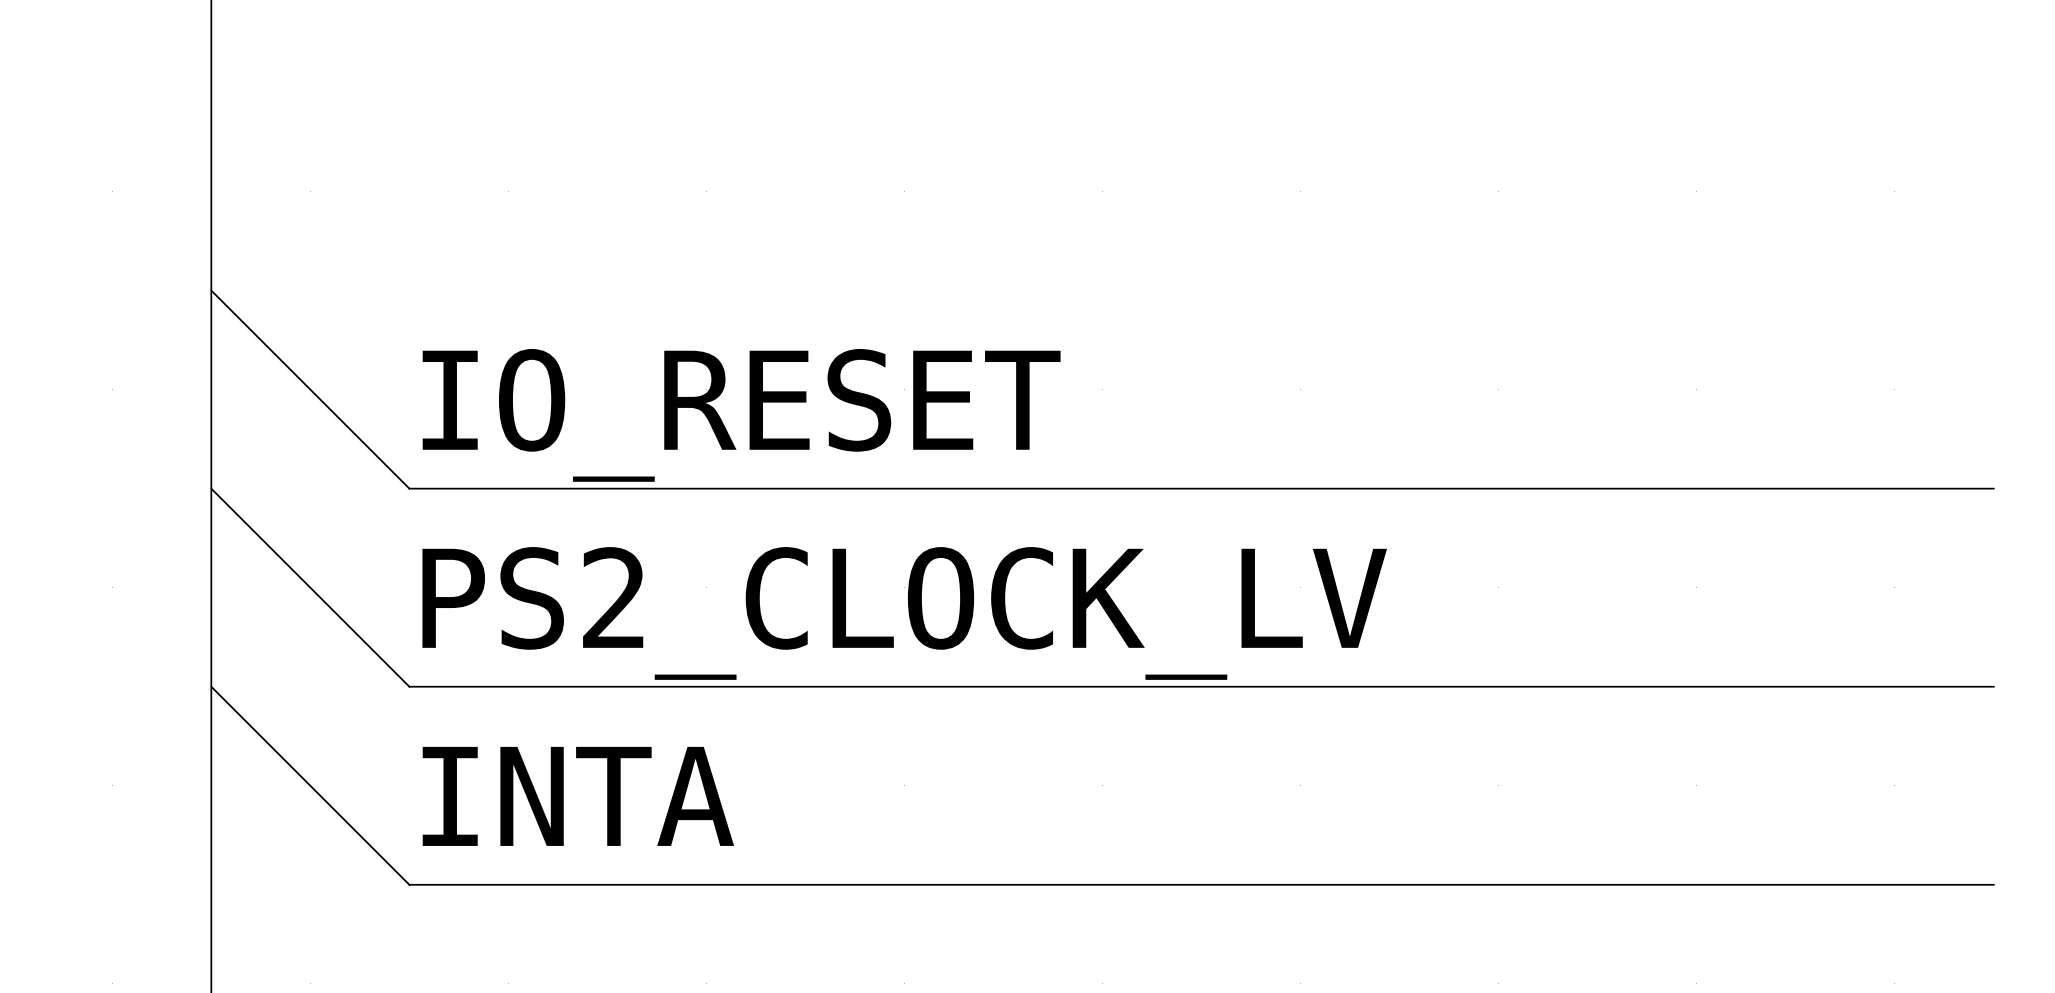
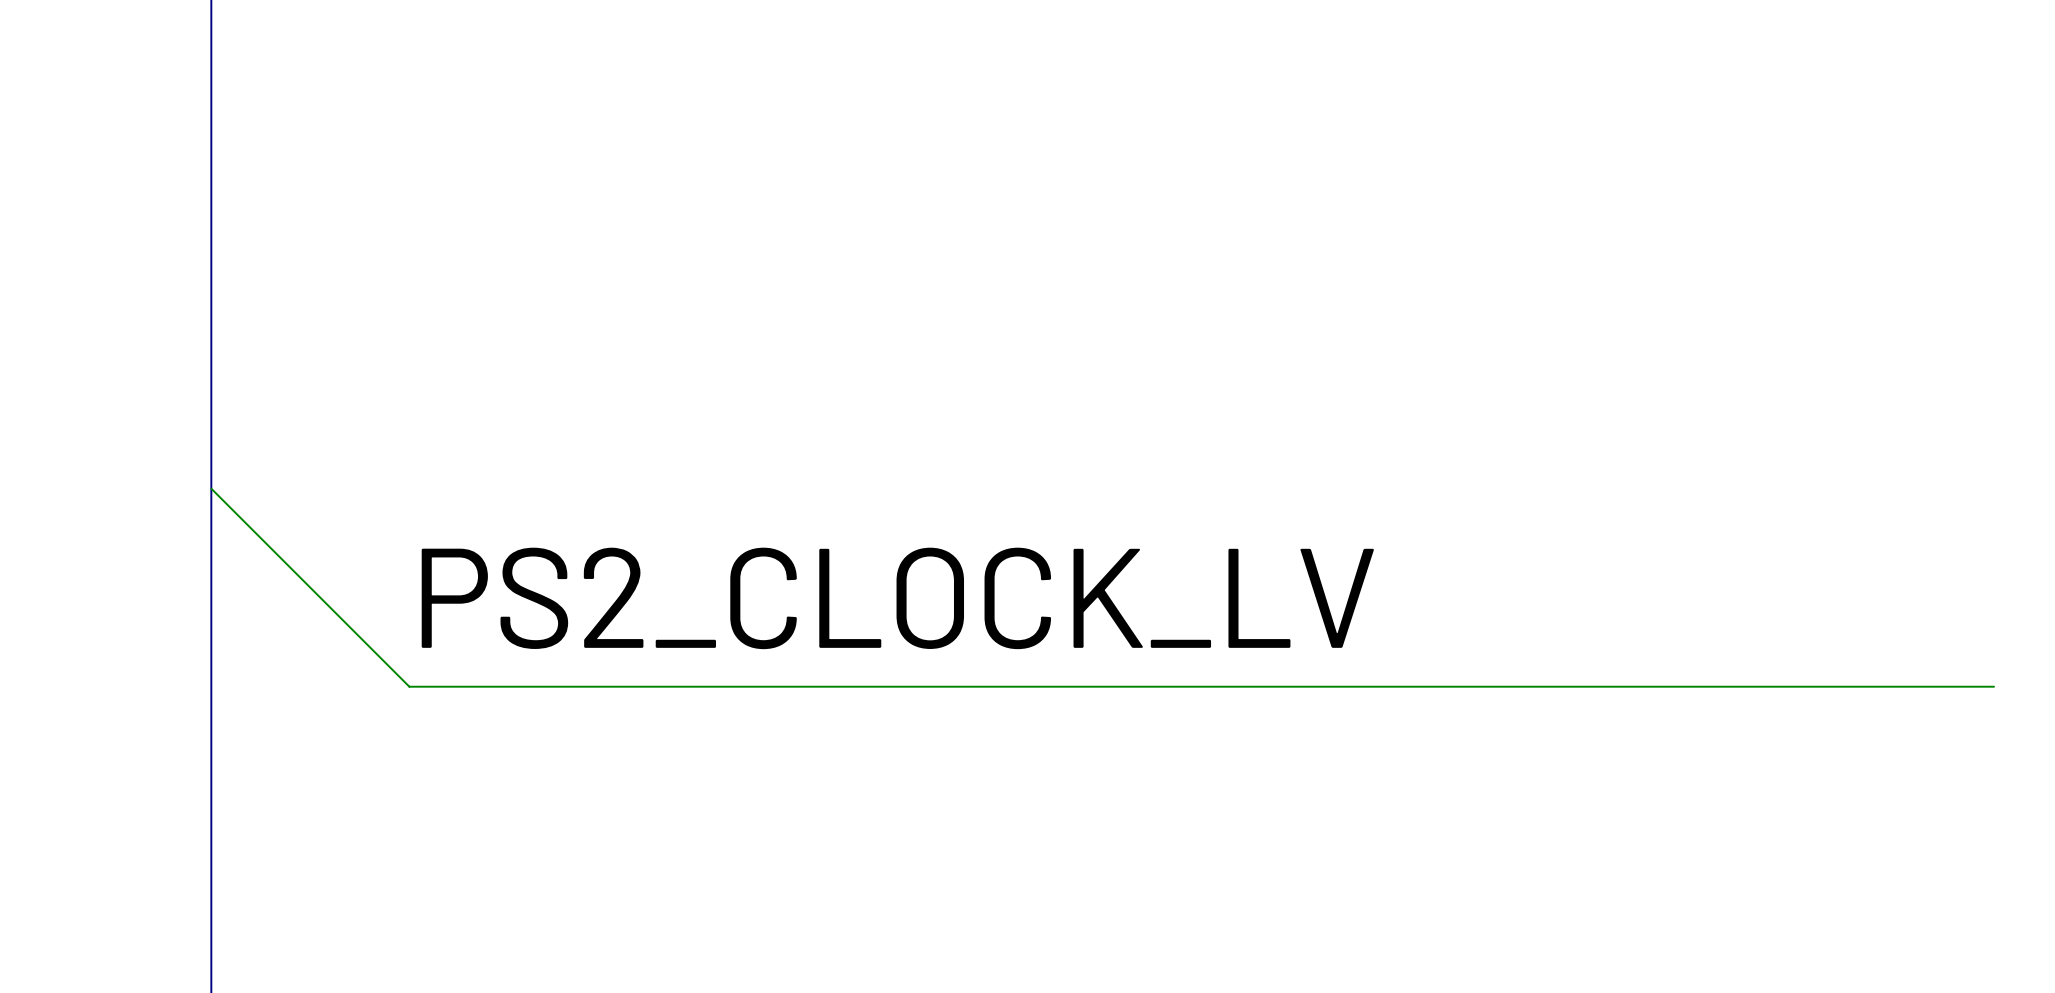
wire: (211, 290) (409, 488) (1994, 488) -> none
label: IO_RESET (741, 415) -> none
wire: (211, 686) (409, 884) (1994, 884) -> none
label: INTA (578, 796) -> none

